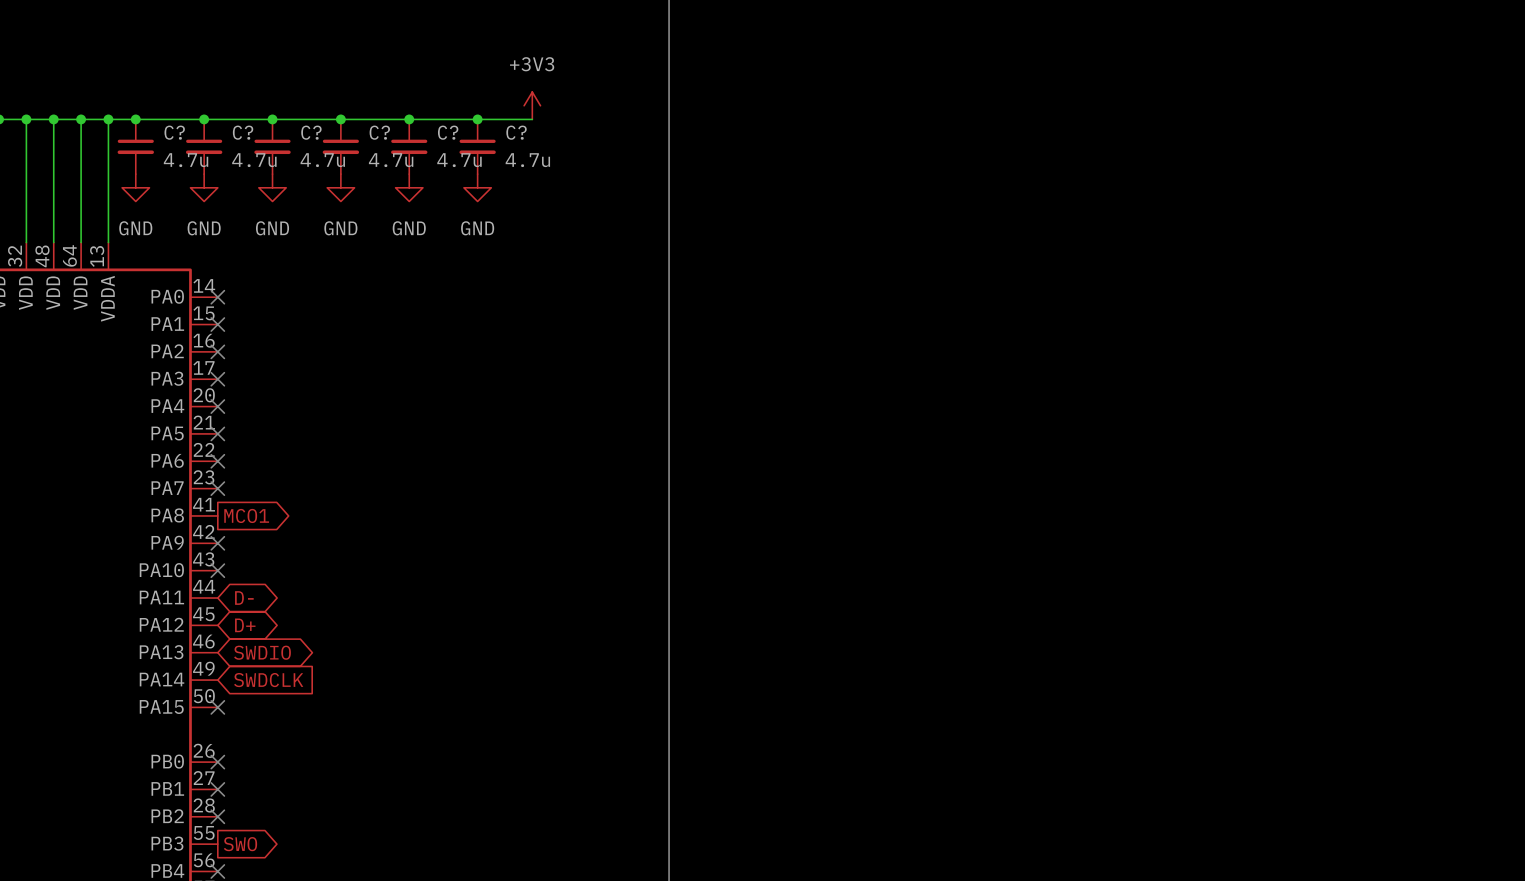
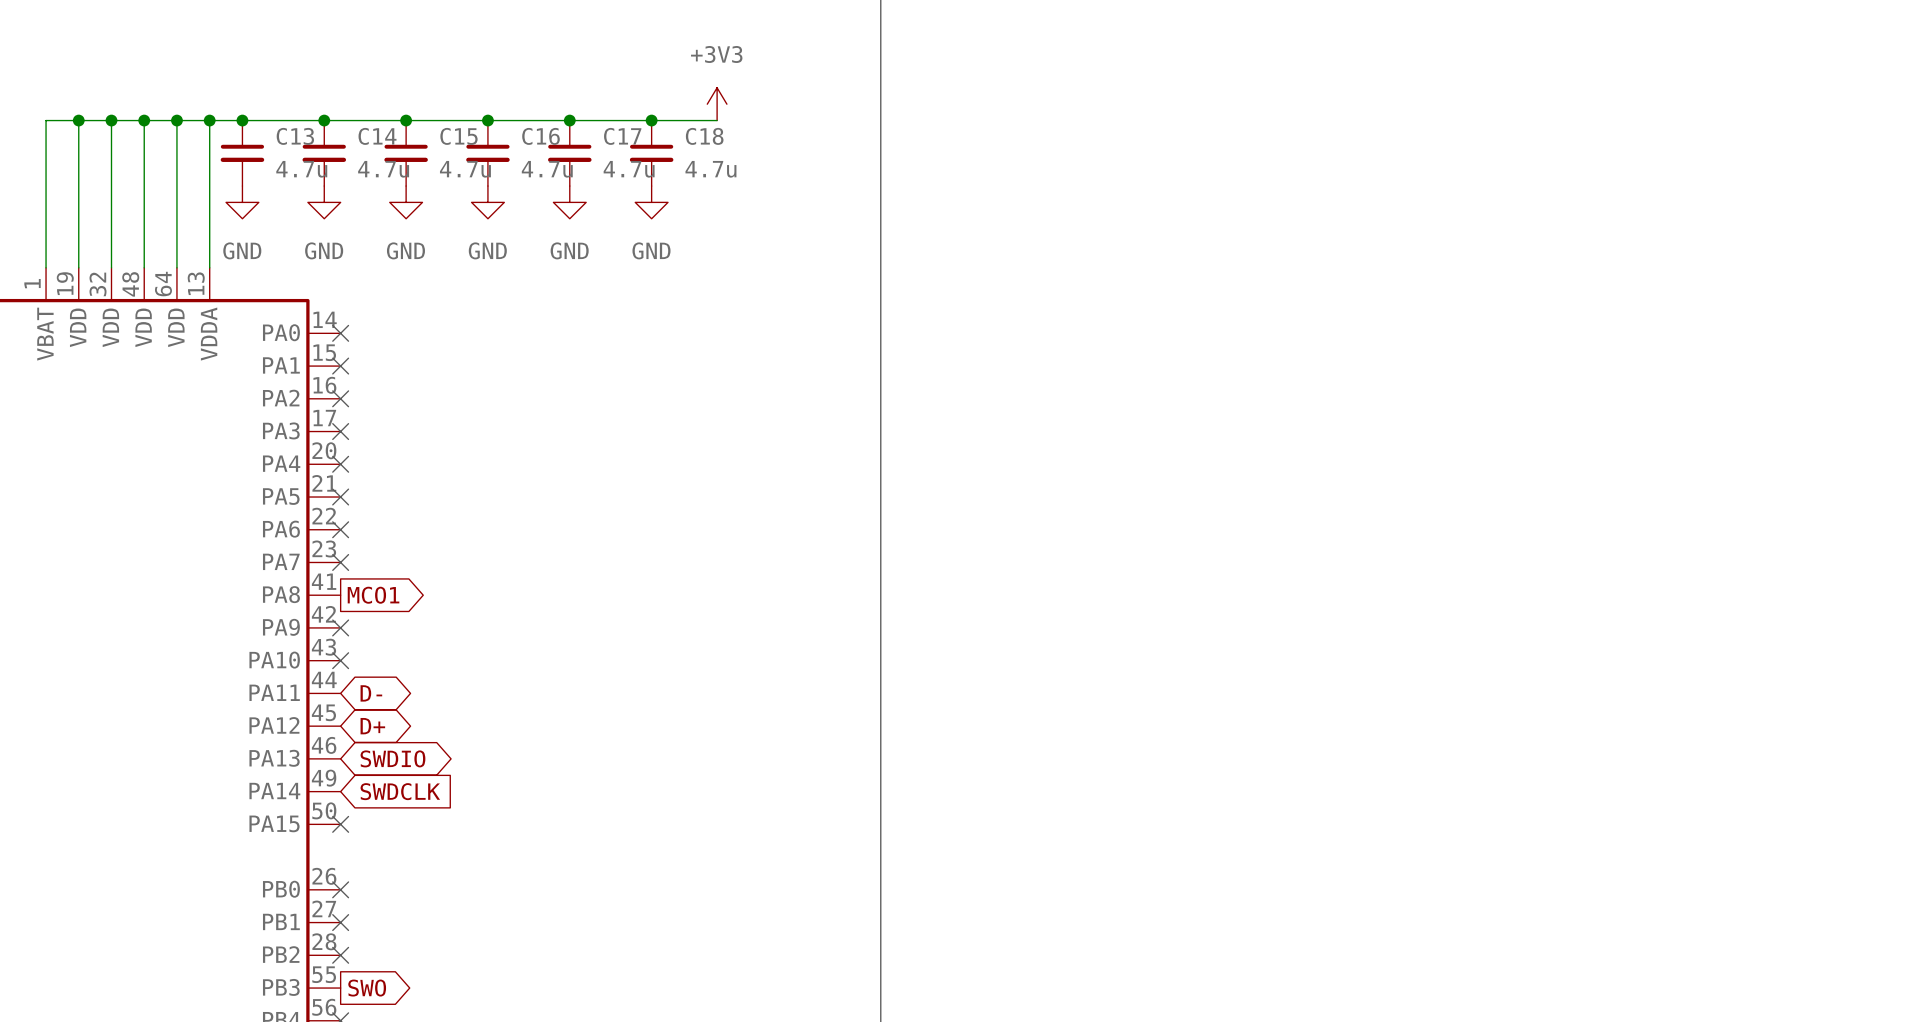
C? name: C? (174, 132) -> C13 (295, 136)
C? name: C? (243, 132) -> C14 (377, 136)
C? name: C? (311, 132) -> C15 (458, 136)
C? name: C? (379, 132) -> C16 (540, 136)
C? name: C? (448, 132) -> C17 (622, 136)
C? name: C? (516, 132) -> C18 (704, 136)

